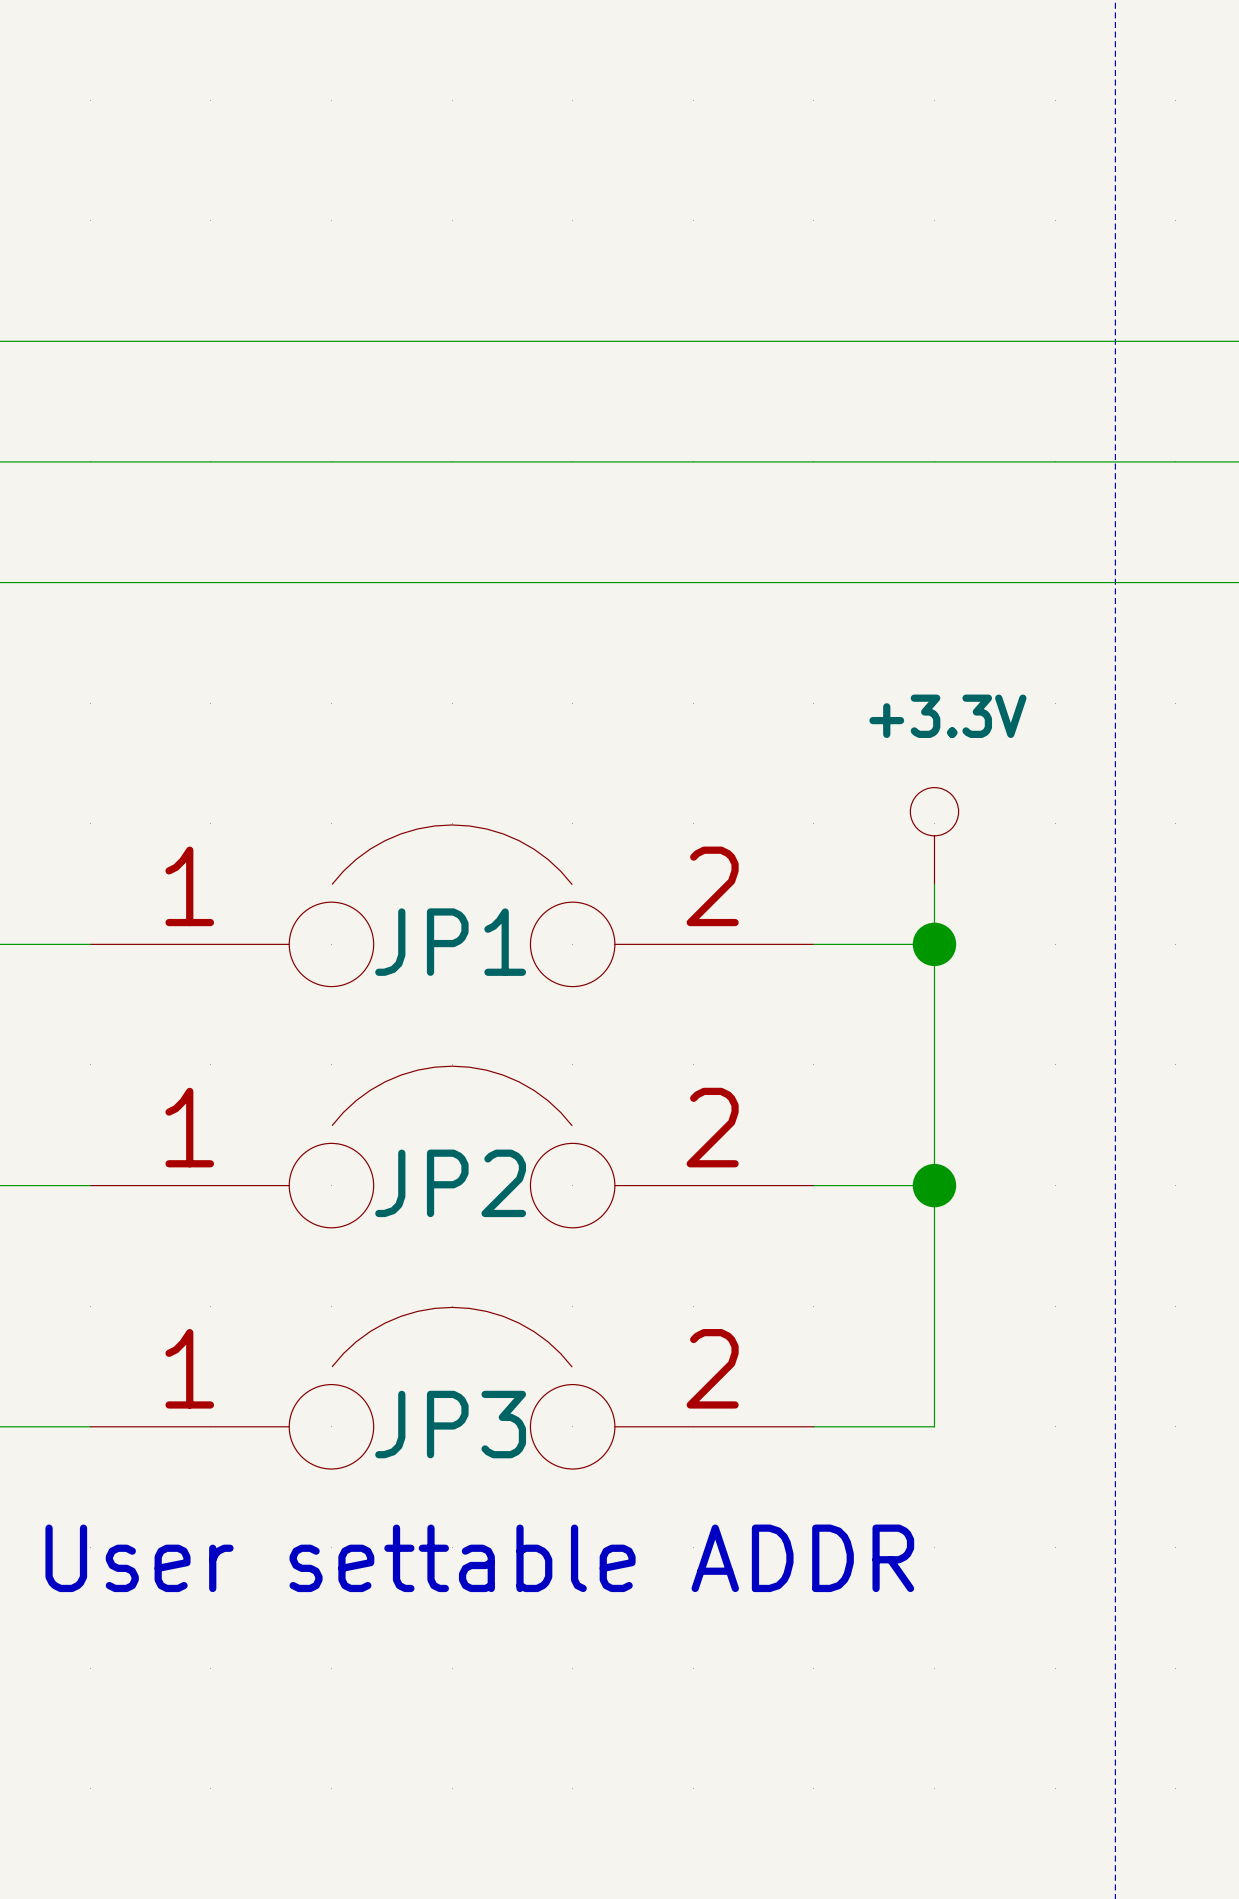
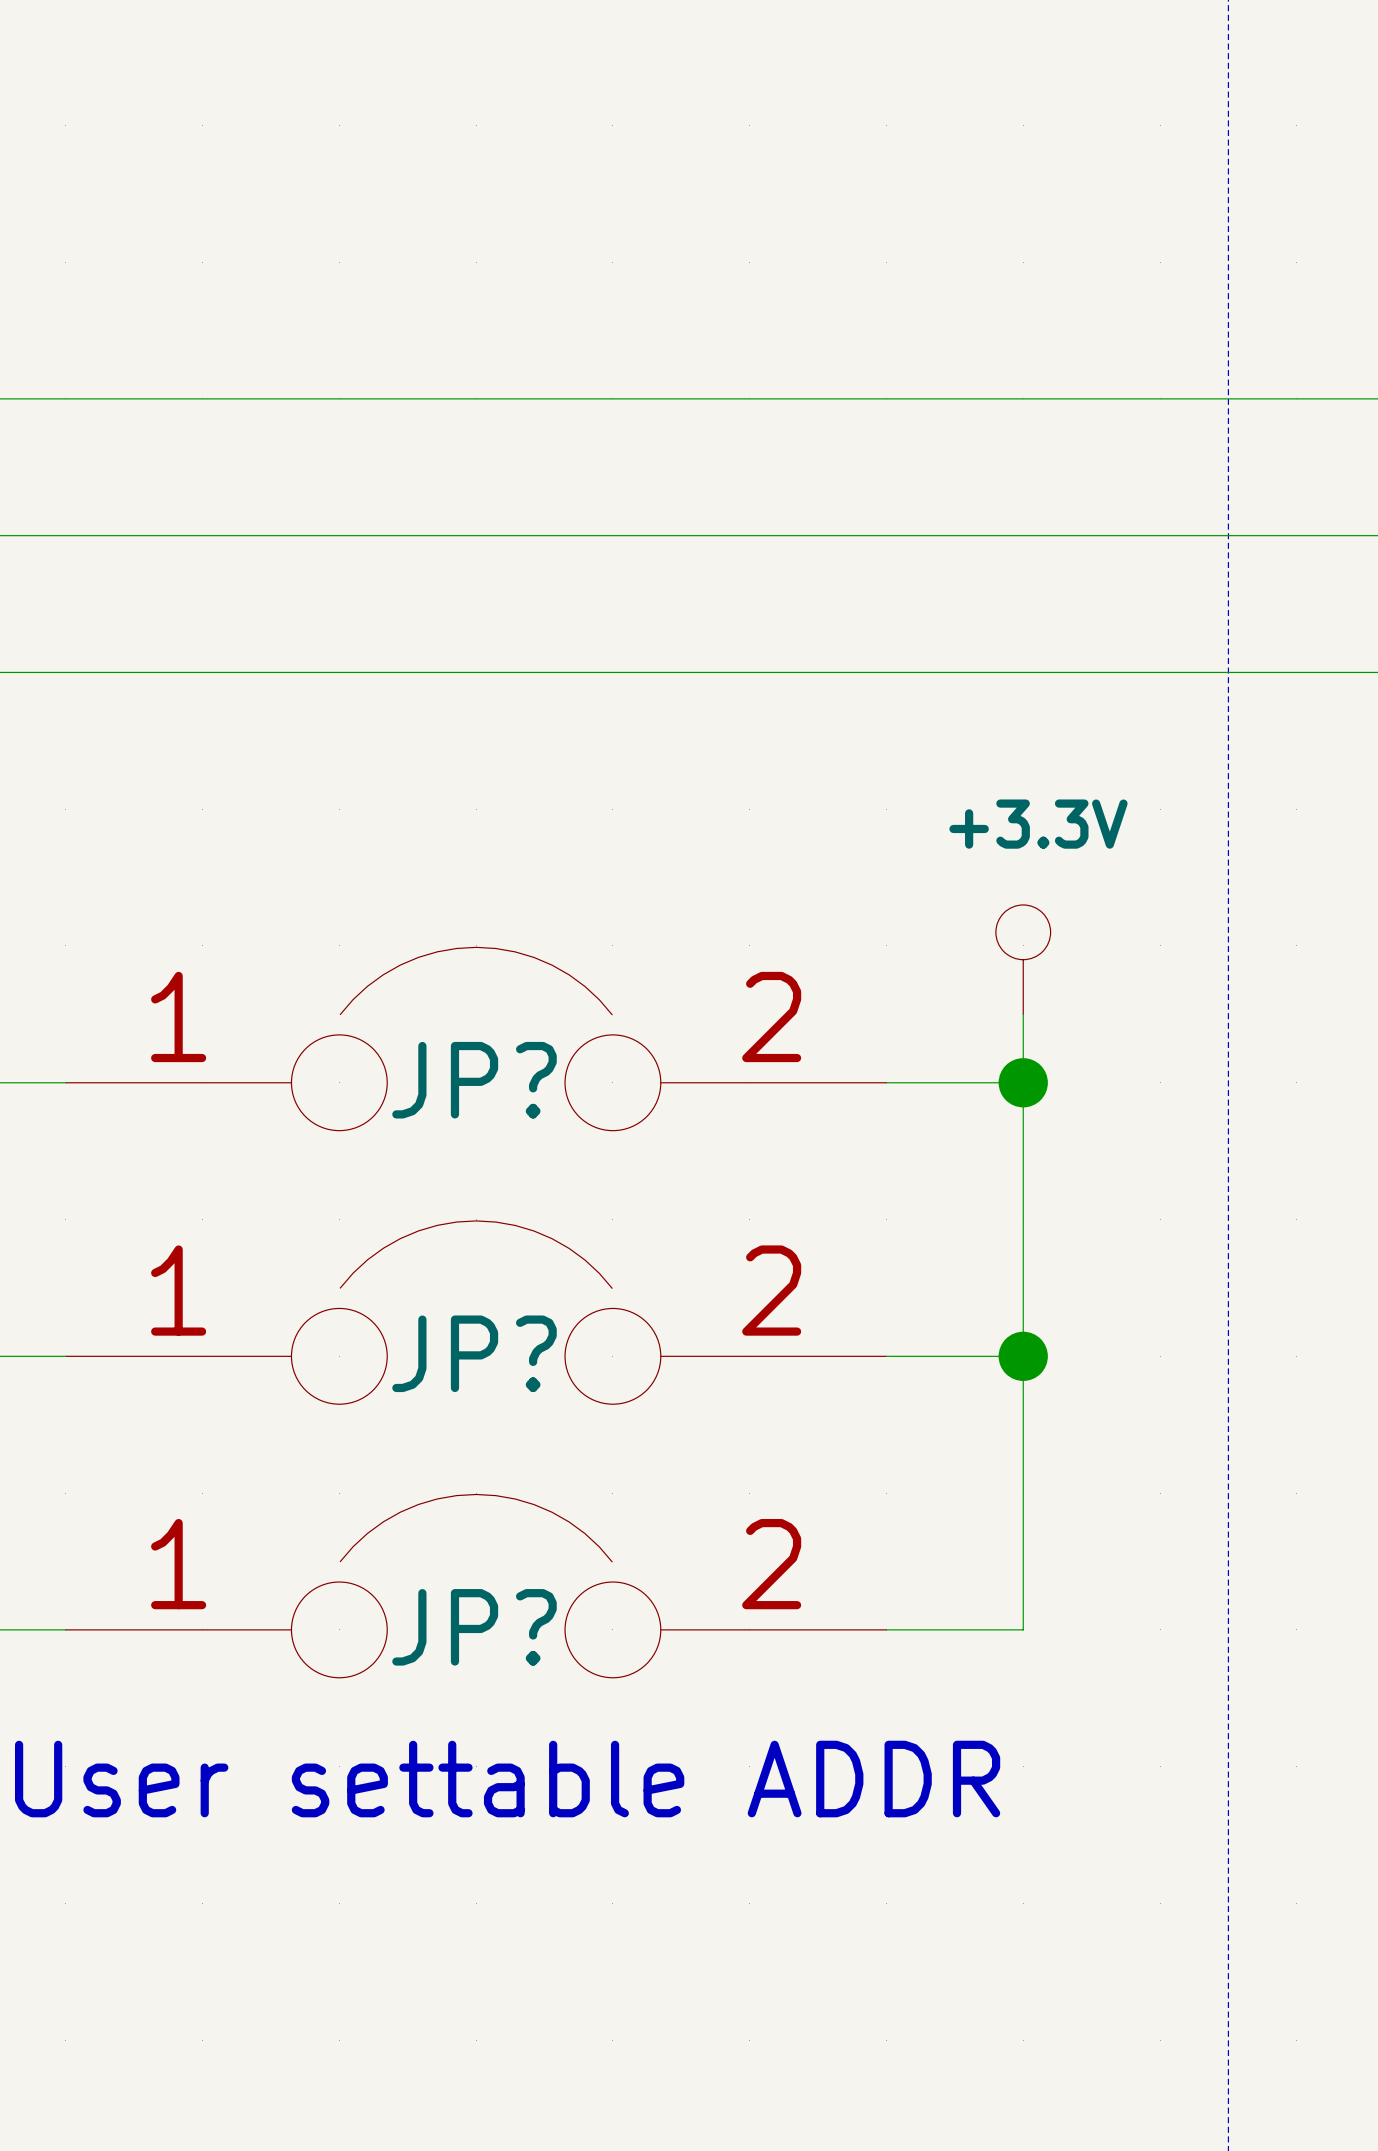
JP1 name: JP1 (450, 942) -> JP? (474, 1080)
JP2 name: JP2 (450, 1183) -> JP? (474, 1353)
JP3 name: JP3 (450, 1424) -> JP? (474, 1627)

